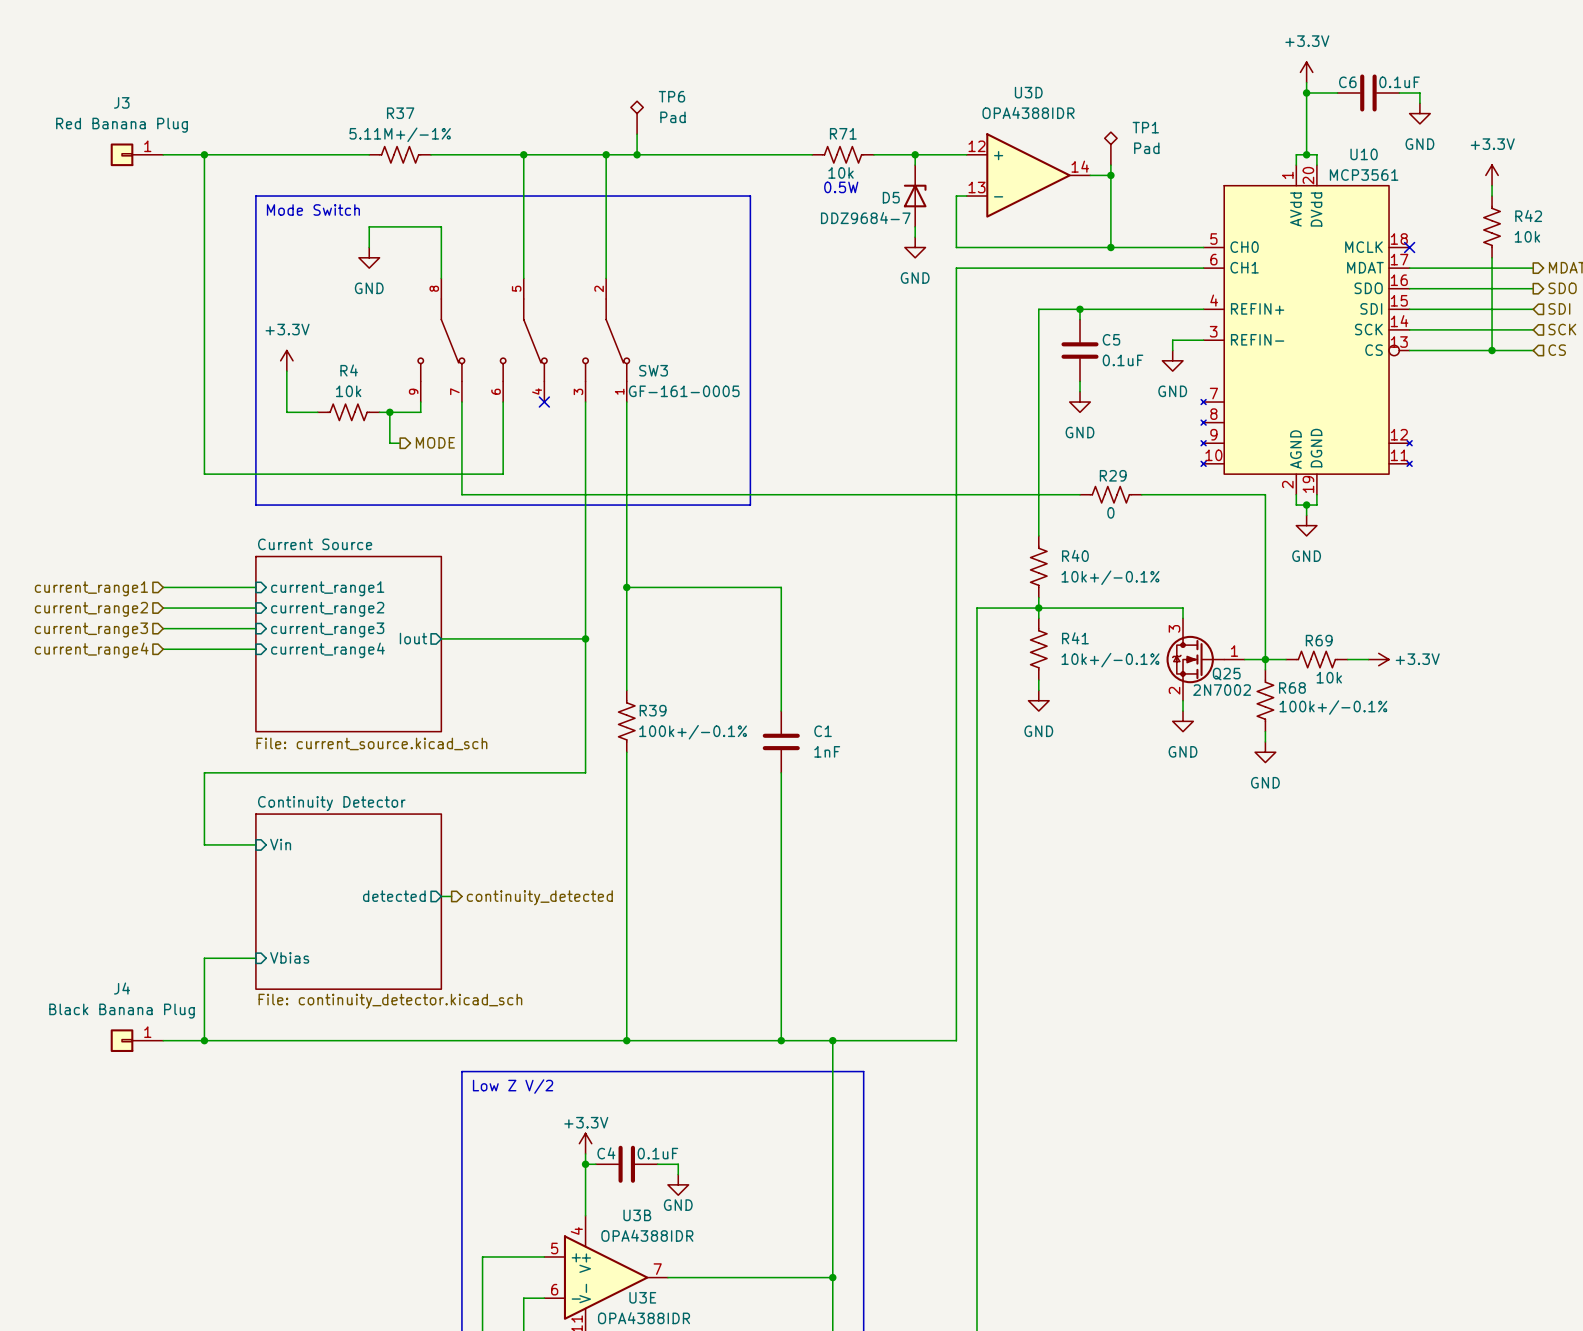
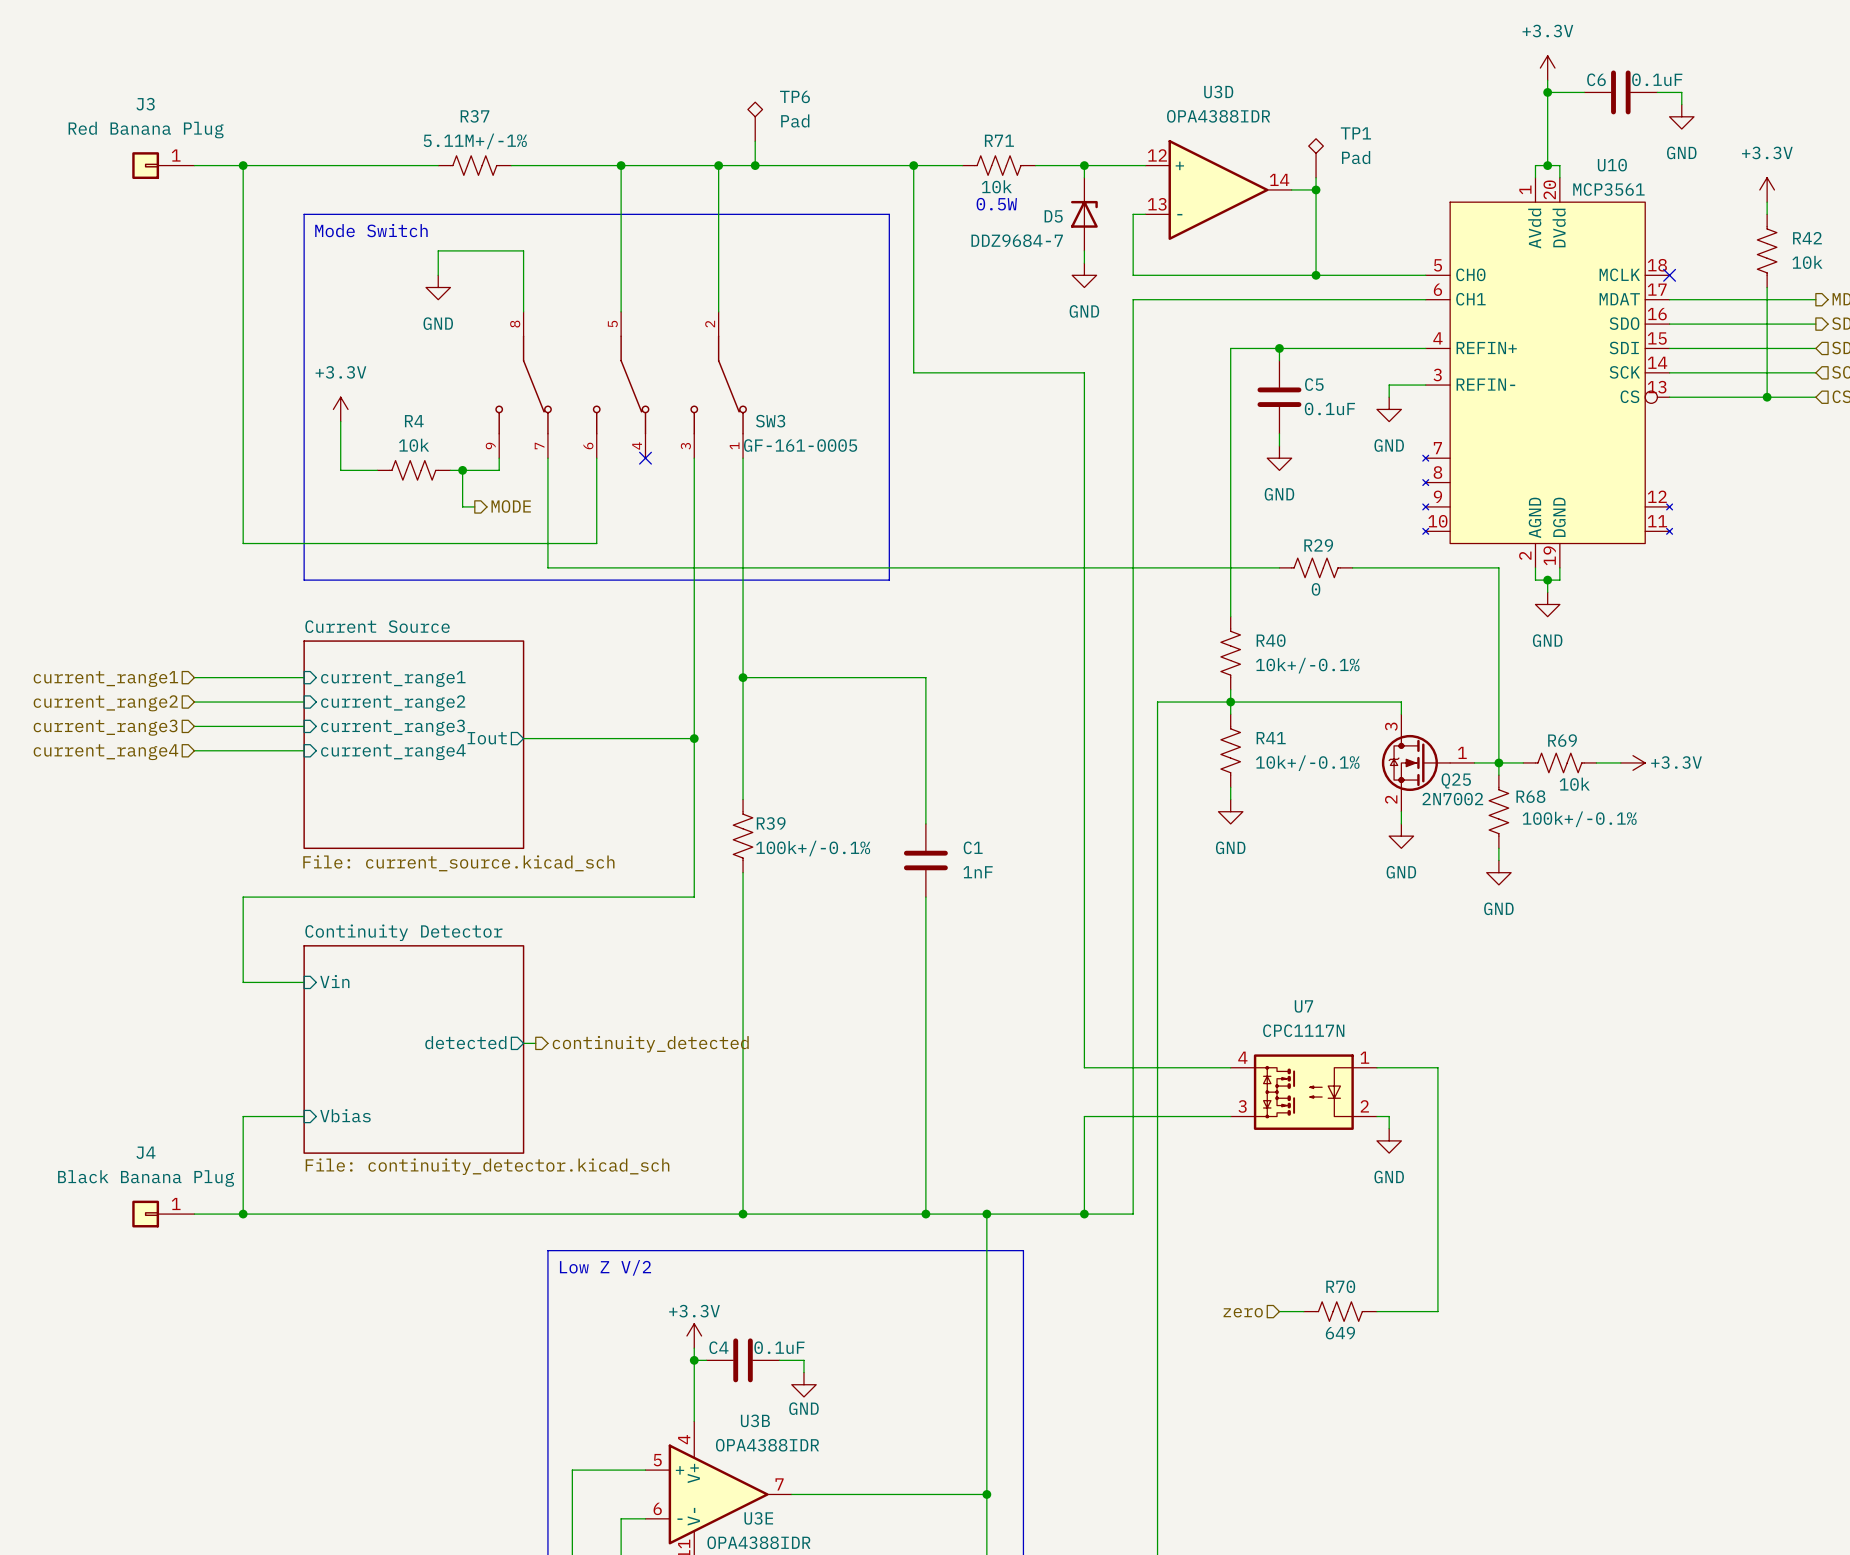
wire: none -> (913, 165) (913, 372) (1084, 372) (1084, 1067) (1230, 1067)
junction: none -> (913, 165)
wire: none -> (1376, 1067) (1437, 1067) (1437, 1311) (1376, 1311)
U7: none -> CPC1117N (1303, 1092)
wire: none -> (1230, 1116) (1084, 1116) (1084, 1214)
wire: none -> (1376, 1116) (1389, 1116) (1389, 1128)
power symbol: none -> GND (1389, 1140)
junction: none -> (1084, 1214)
wire: none -> (1279, 1311) (1303, 1311)
R70: none -> 649 (1340, 1311)
hierarchical label: none -> zero (1243, 1312)

